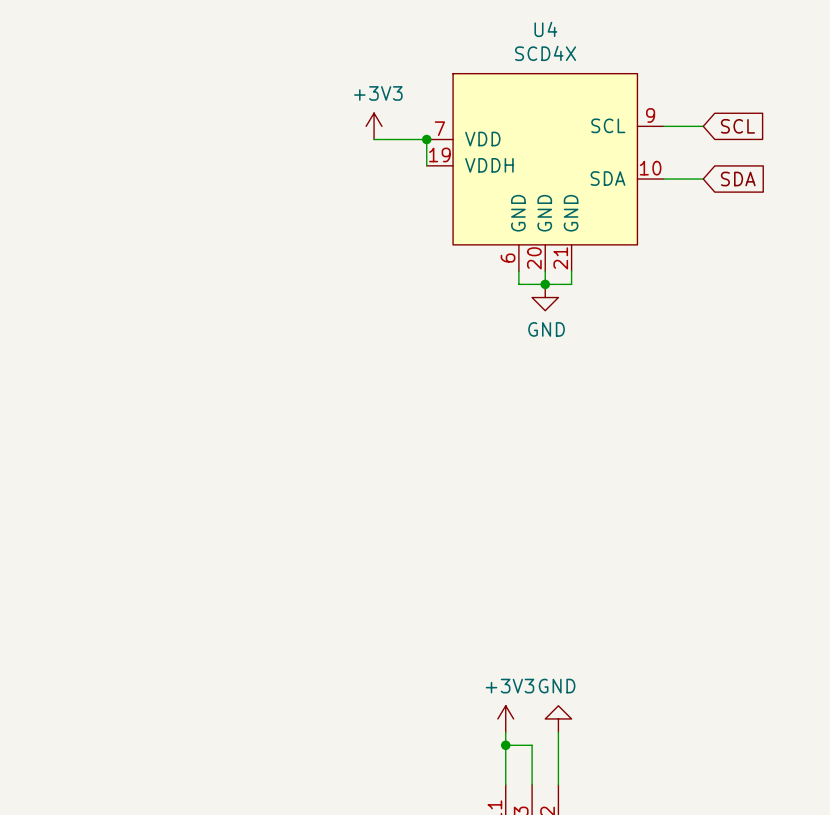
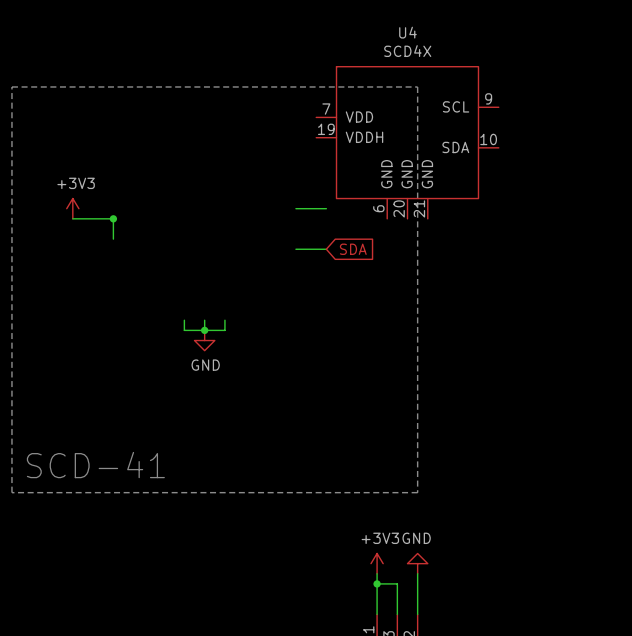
line: none -> (11, 86) (417, 86) (417, 492) (11, 492) (11, 86)
power symbol: +3V3 (374, 126) -> none
wire: (663, 126) (703, 126) -> none
global label: SCL (737, 126) -> none
wire: (374, 139) (426, 139) (426, 165) -> none
junction: (426, 139) -> none
wire: (663, 179) (703, 179) -> none
global label: SDA (738, 179) -> none
power symbol: none -> +3V3 (72, 208)
wire: none -> (295, 208) (326, 208)
wire: none -> (72, 218) (113, 218) (113, 239)
junction: none -> (113, 218)
wire: (518, 271) (518, 284) (571, 284) (571, 271) -> none
wire: (545, 271) (545, 284) -> none
junction: (545, 284) -> none
power symbol: GND (545, 297) -> none
wire: none -> (295, 249) (326, 249)
global label: none -> SDA (353, 249)
wire: none -> (184, 320) (184, 330) (224, 330) (224, 320)
wire: none -> (204, 320) (204, 330)
junction: none -> (204, 330)
power symbol: none -> GND (204, 340)
text: none -> SCD-41 (95, 465)

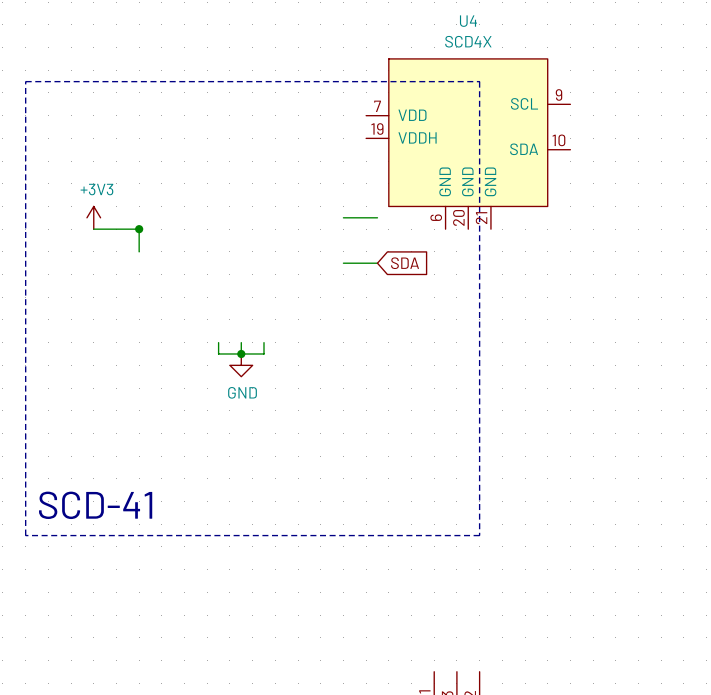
power symbol: +3V3 (377, 563) -> none
power symbol: GND (417, 563) -> none
wire: (377, 573) (377, 614) -> none
wire: (417, 573) (417, 614) -> none
wire: (377, 583) (397, 583) (397, 614) -> none
junction: (377, 583) -> none

